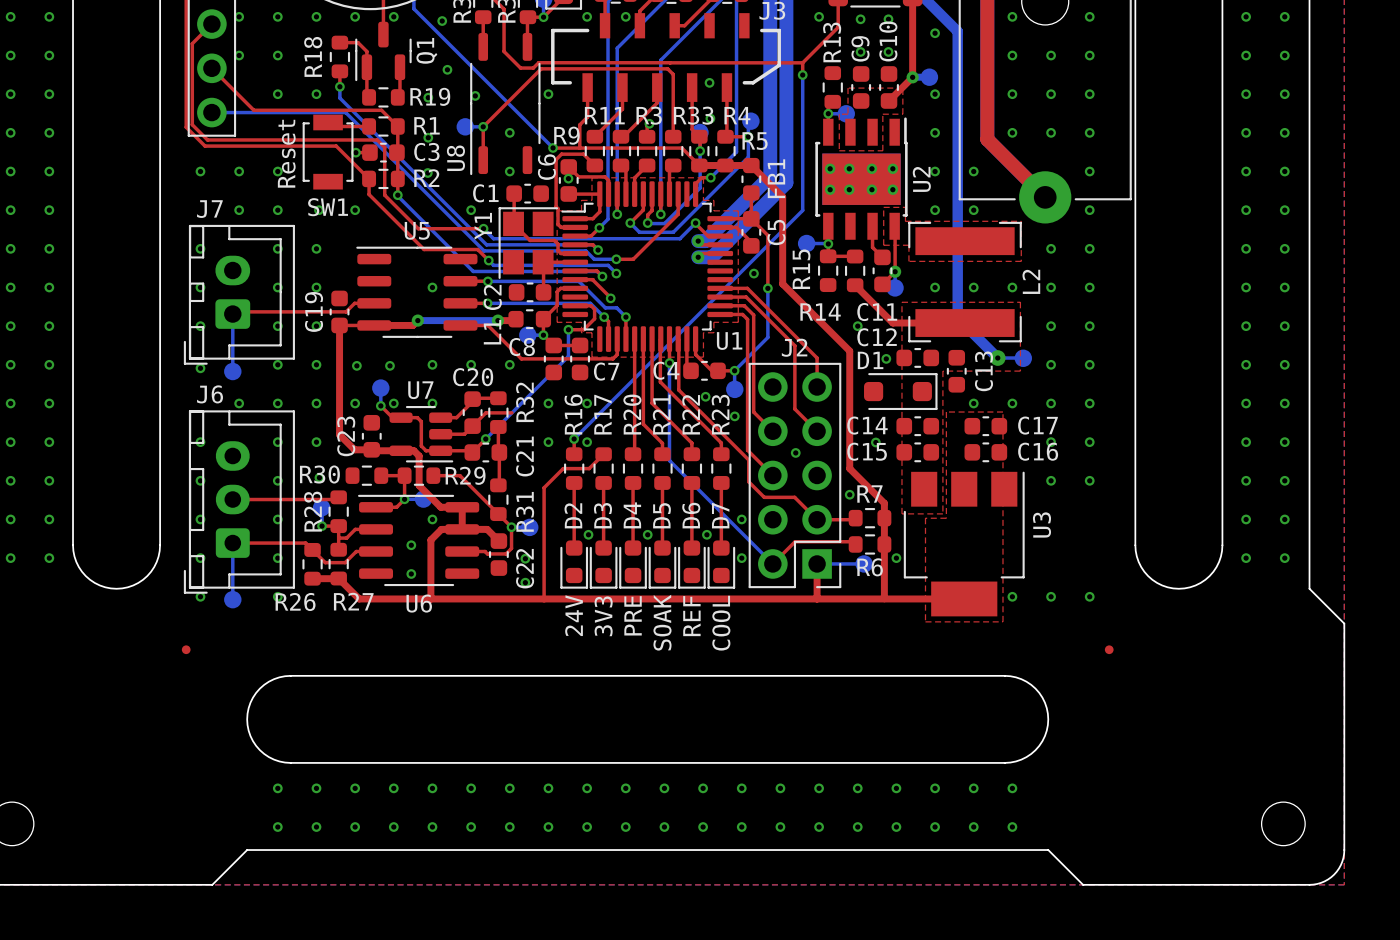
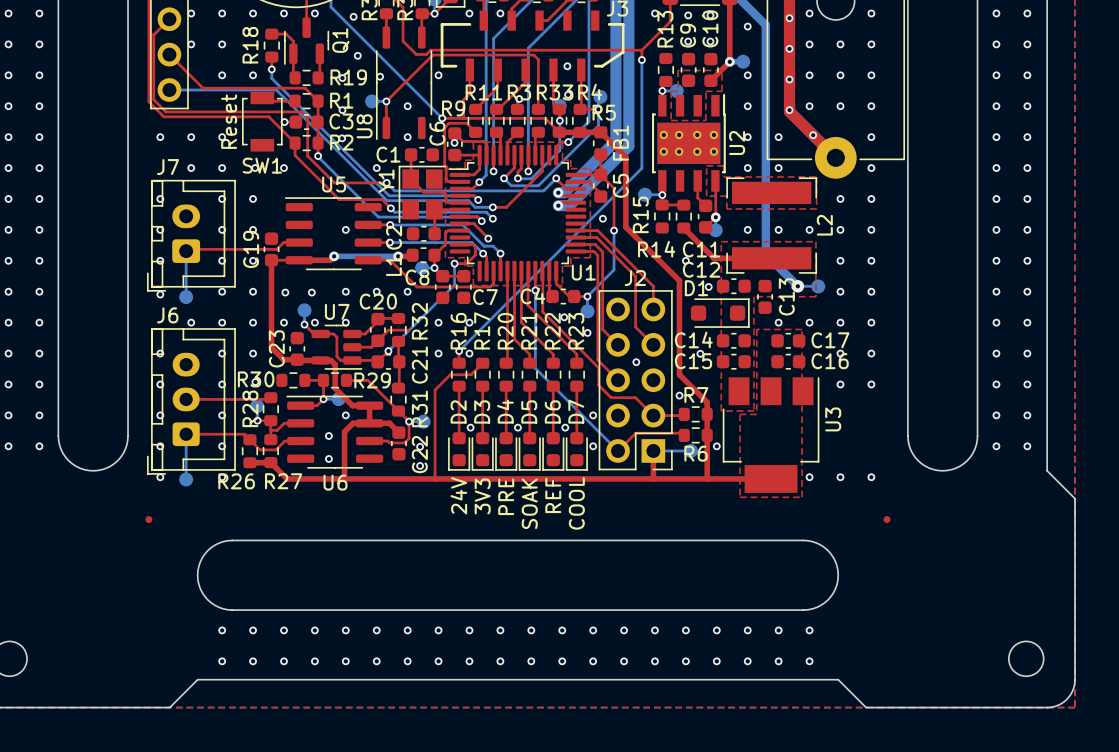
via: none -> (789, 18)
via: none -> (789, 48)
via: none -> (789, 79)
via: none -> (789, 110)
via: none -> (813, 135)

